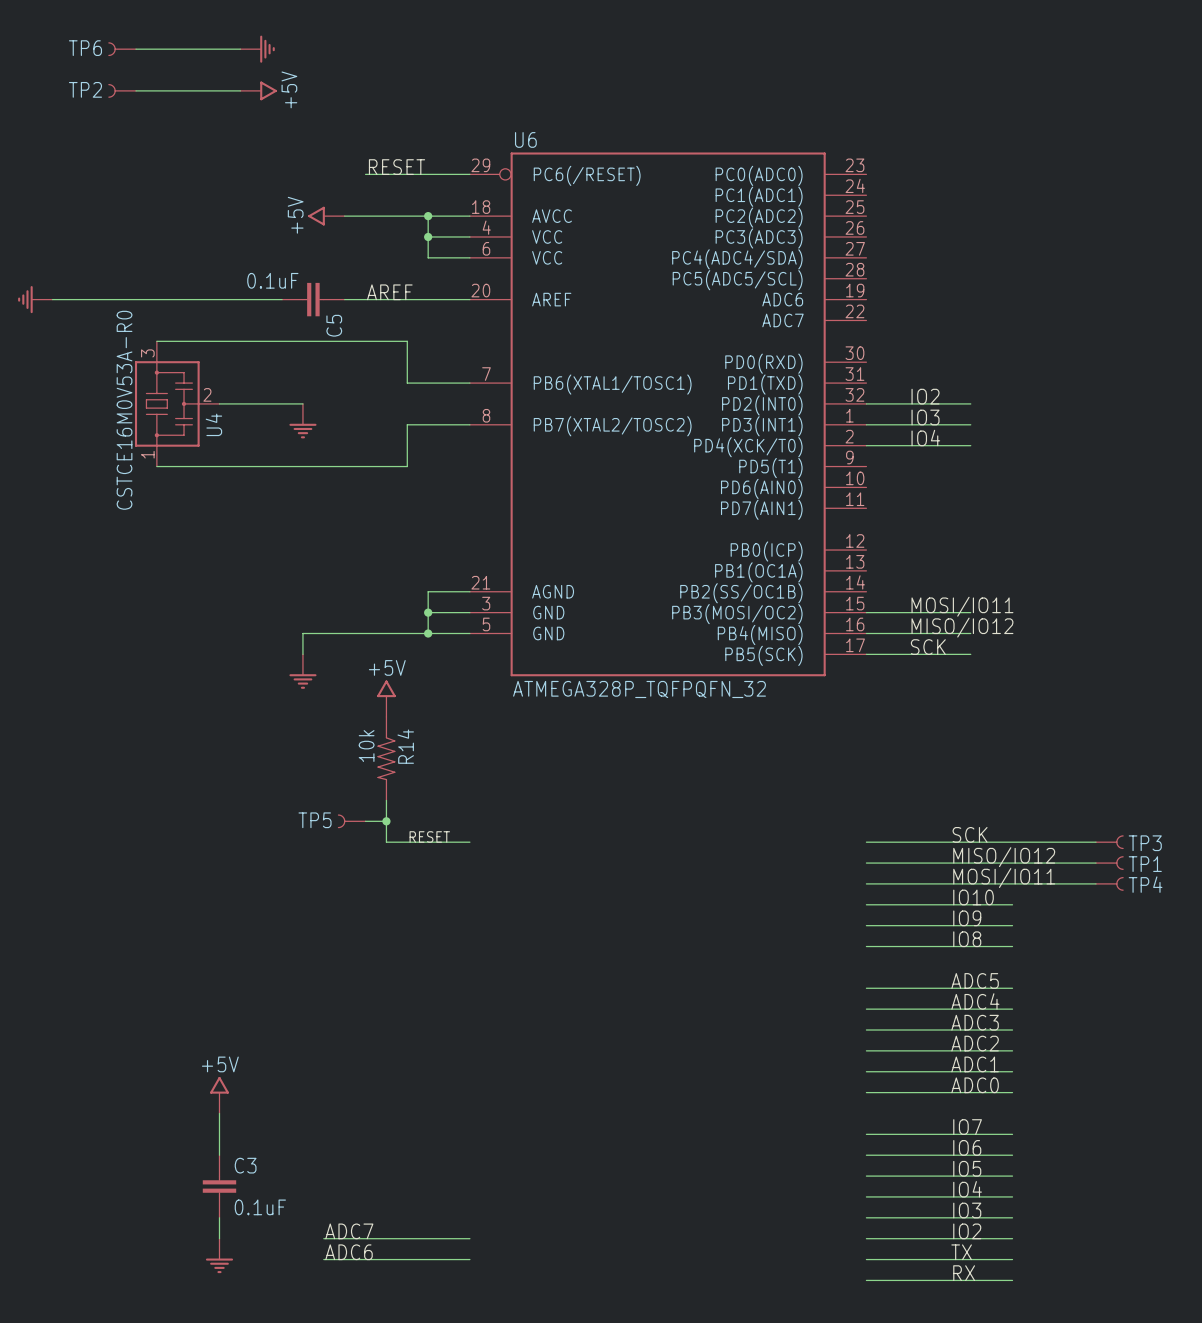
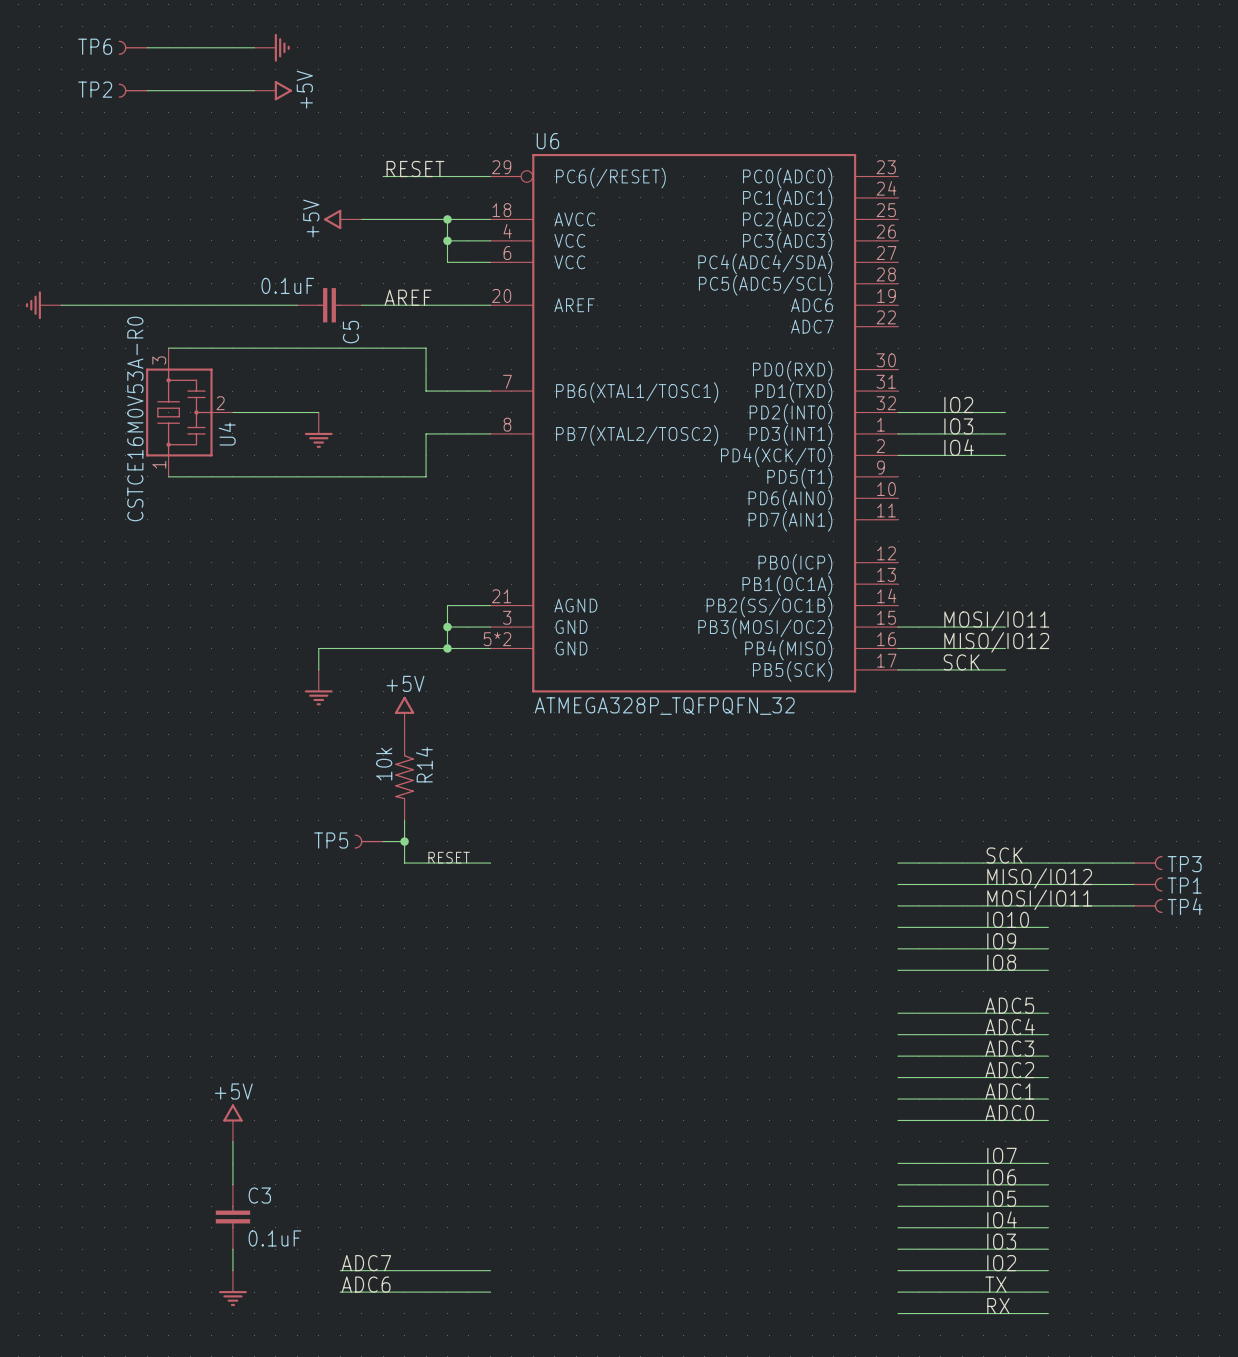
U6 pin number: 5 (486, 624) -> 5*2 (497, 639)

